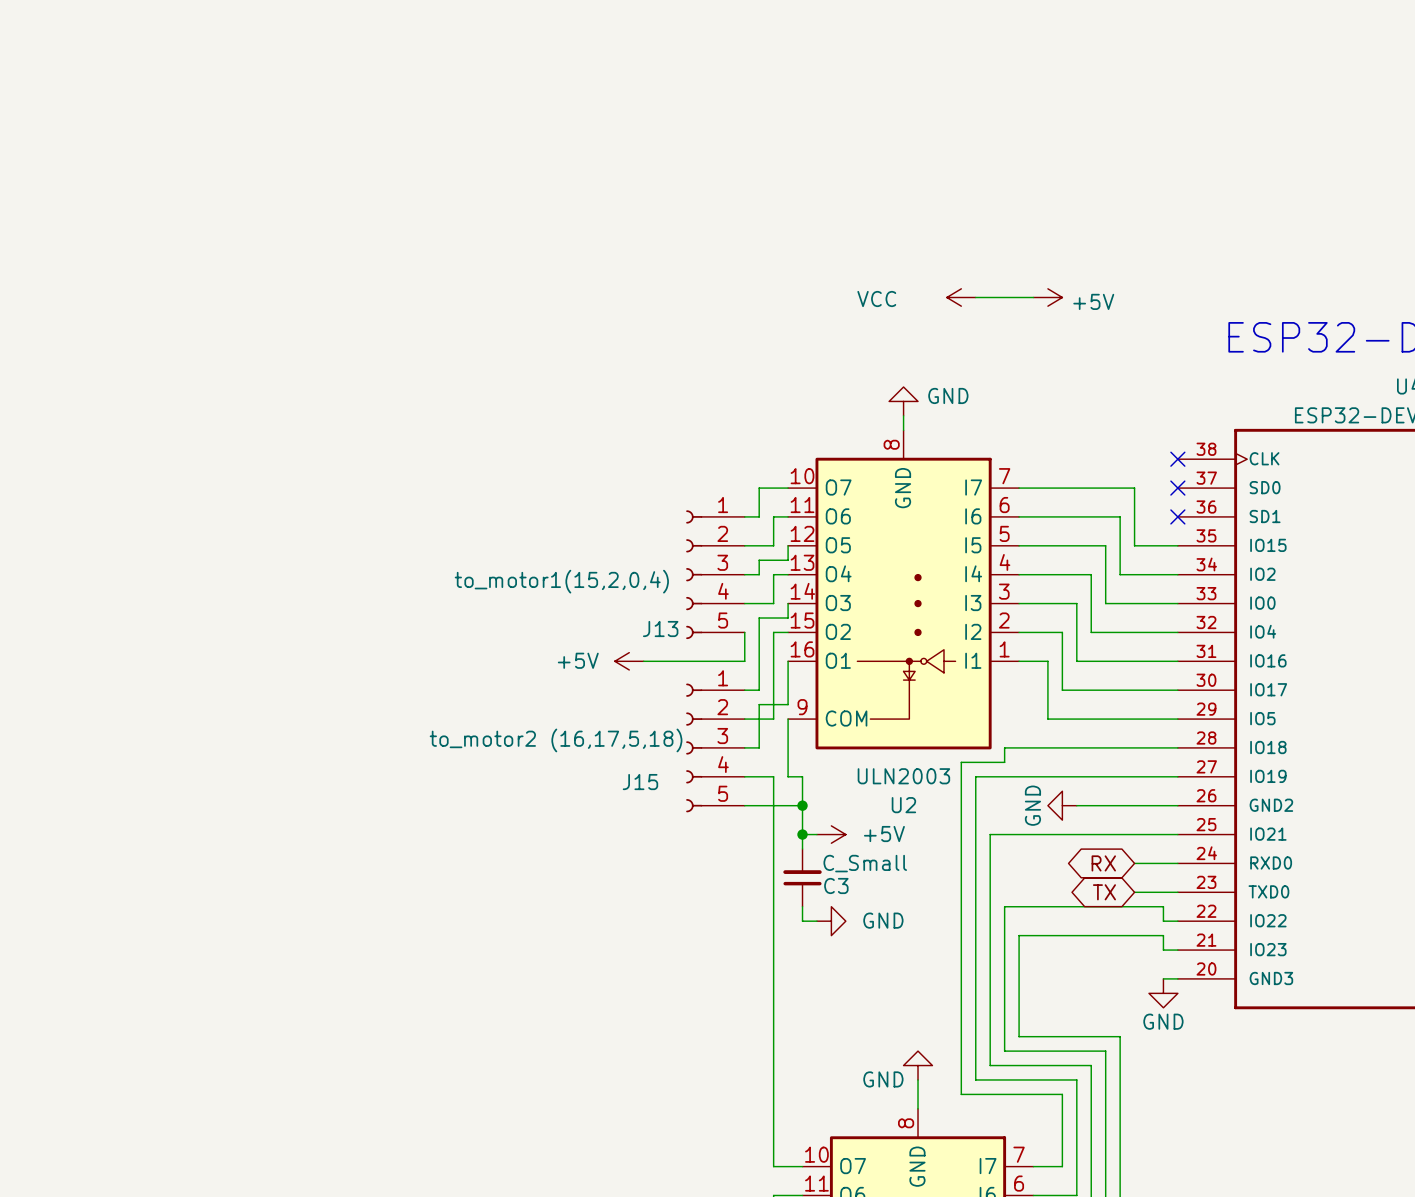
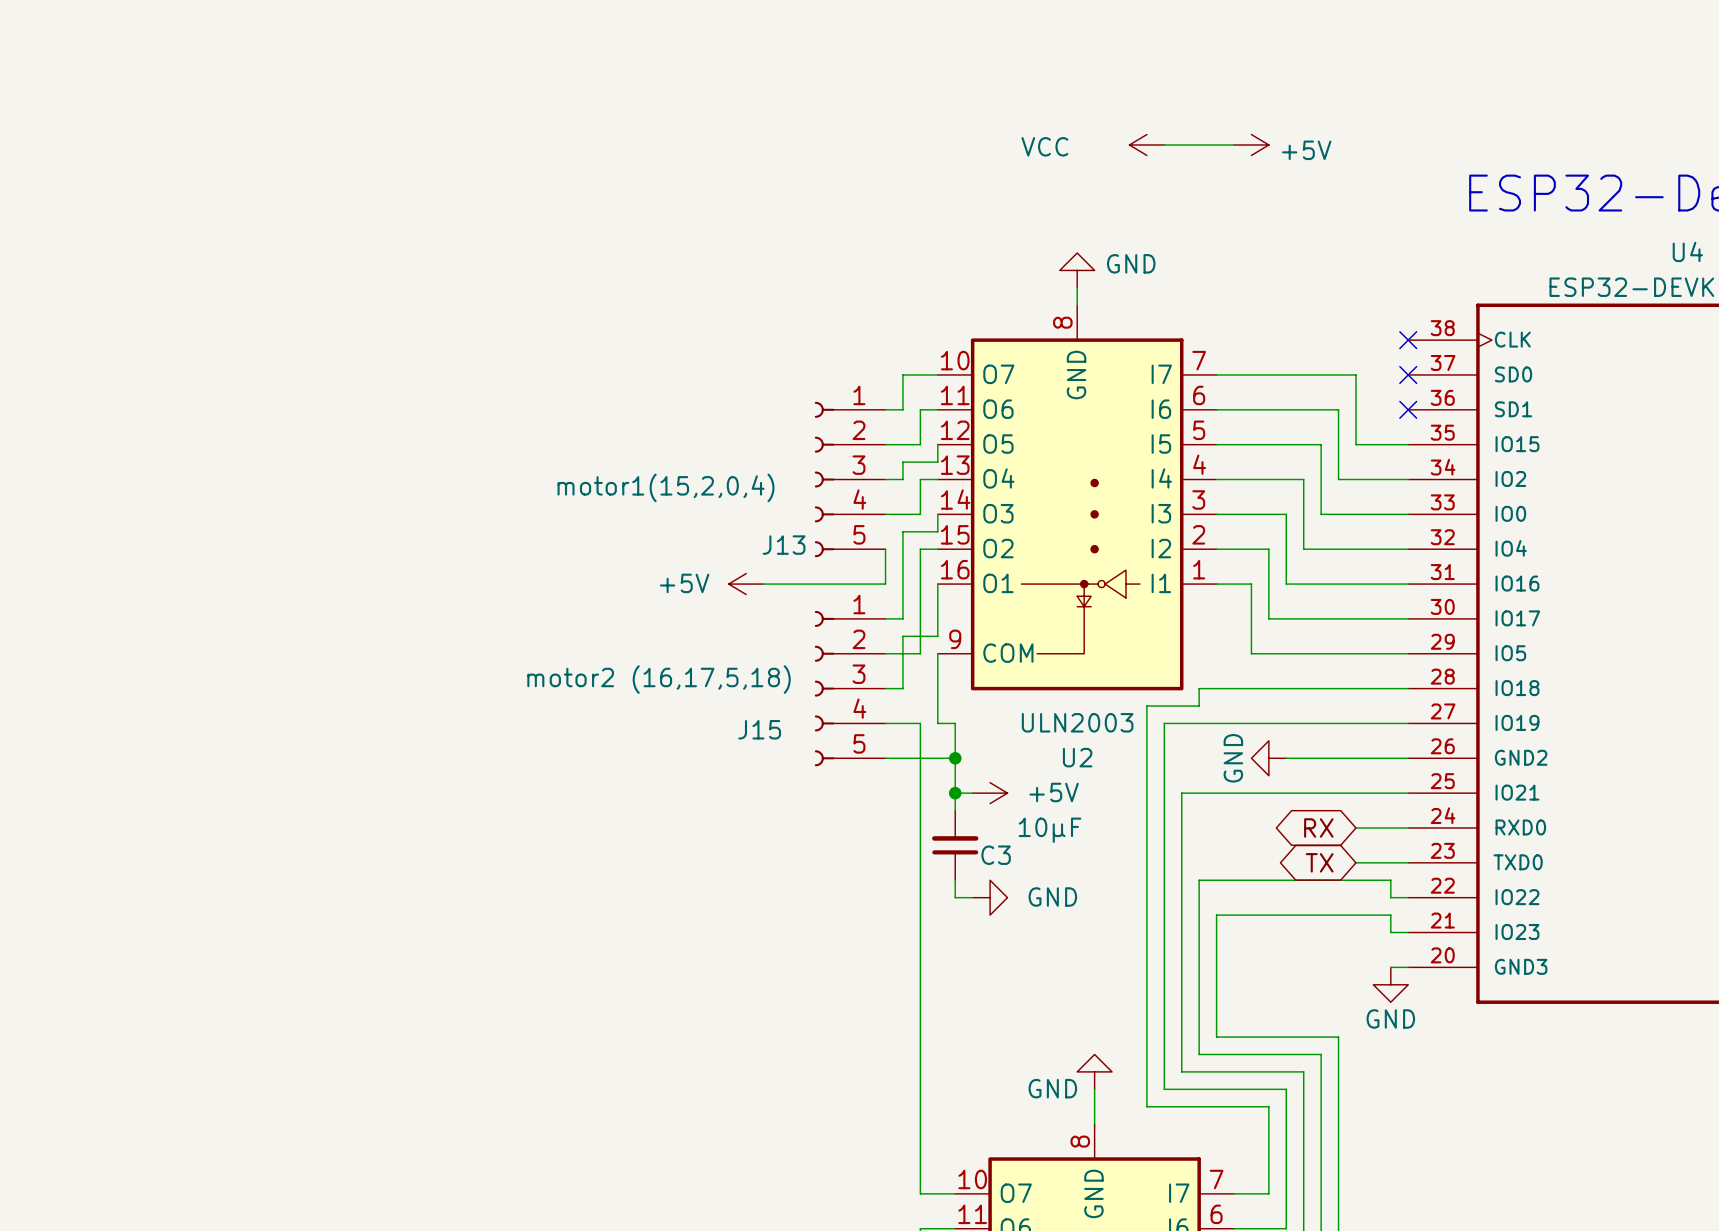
J13 value: to_motor1(15,2,0,4) (561, 581) -> motor1(15,2,0,4) (666, 487)
J15 value: to_motor2 (16,17,5,18) (556, 740) -> motor2 (16,17,5,18) (659, 679)
C3 value: C_Small (865, 863) -> 10µF (1050, 830)

